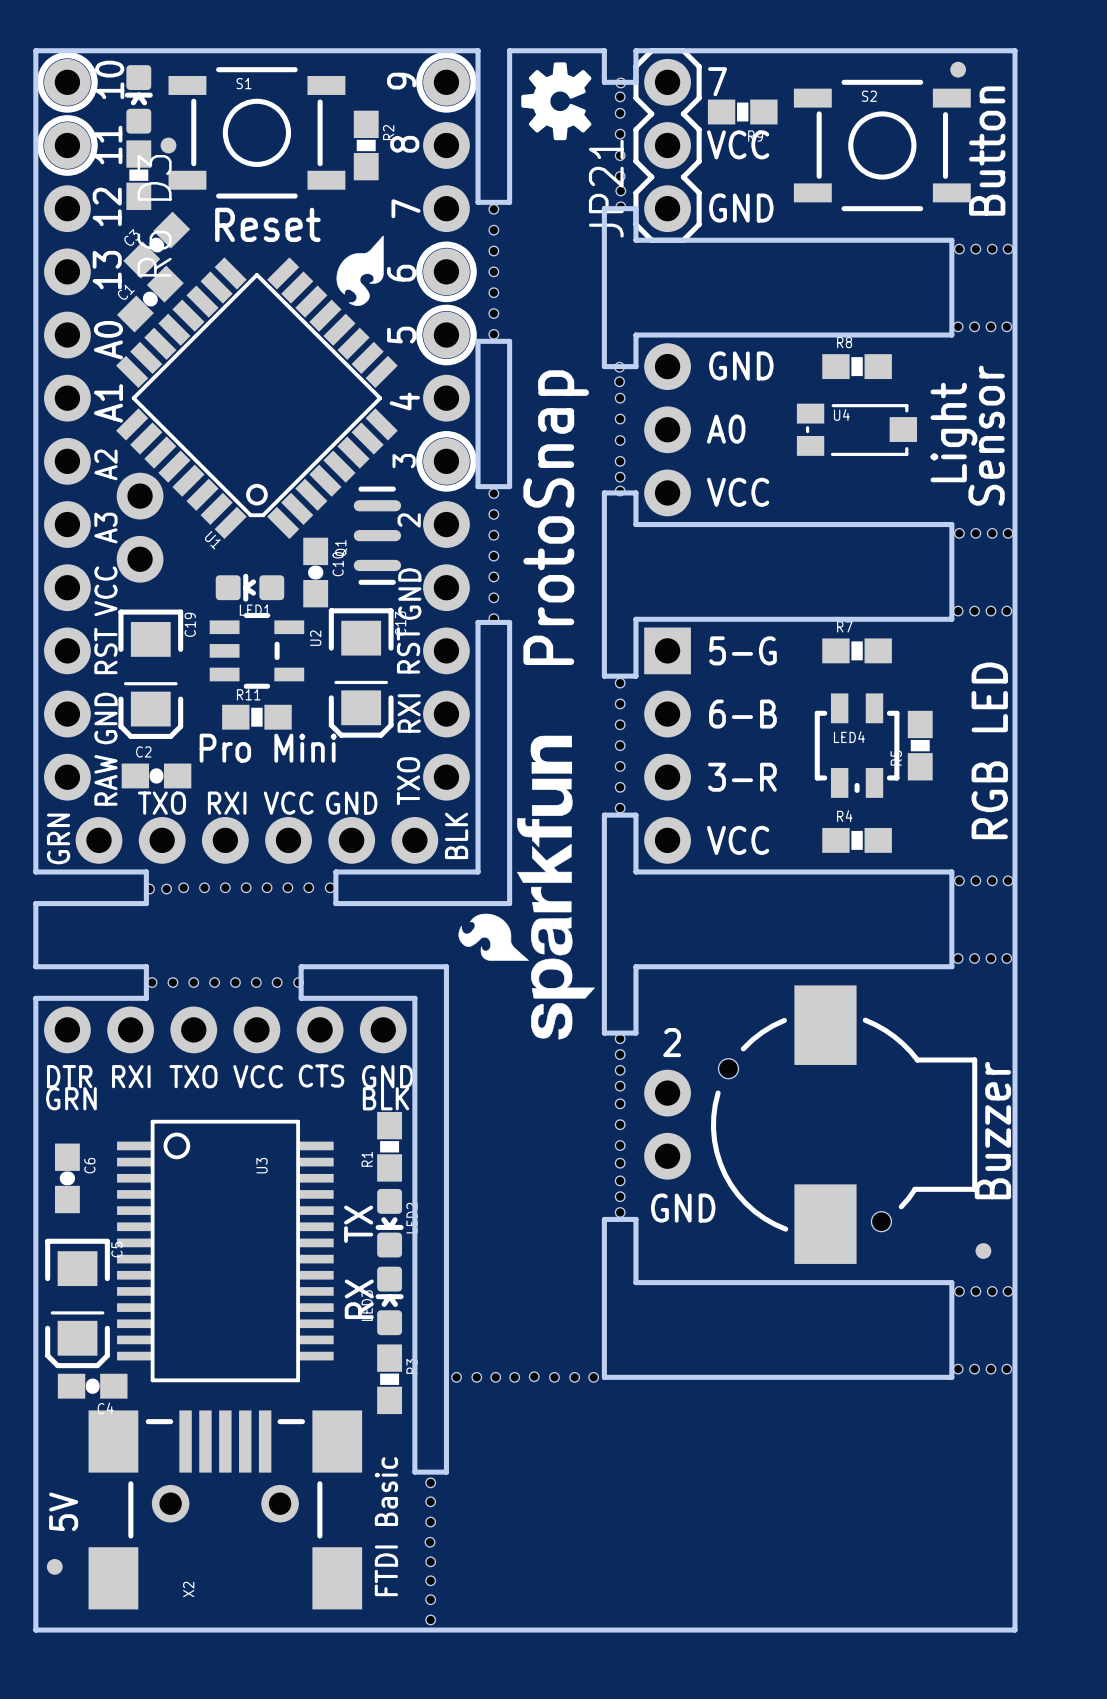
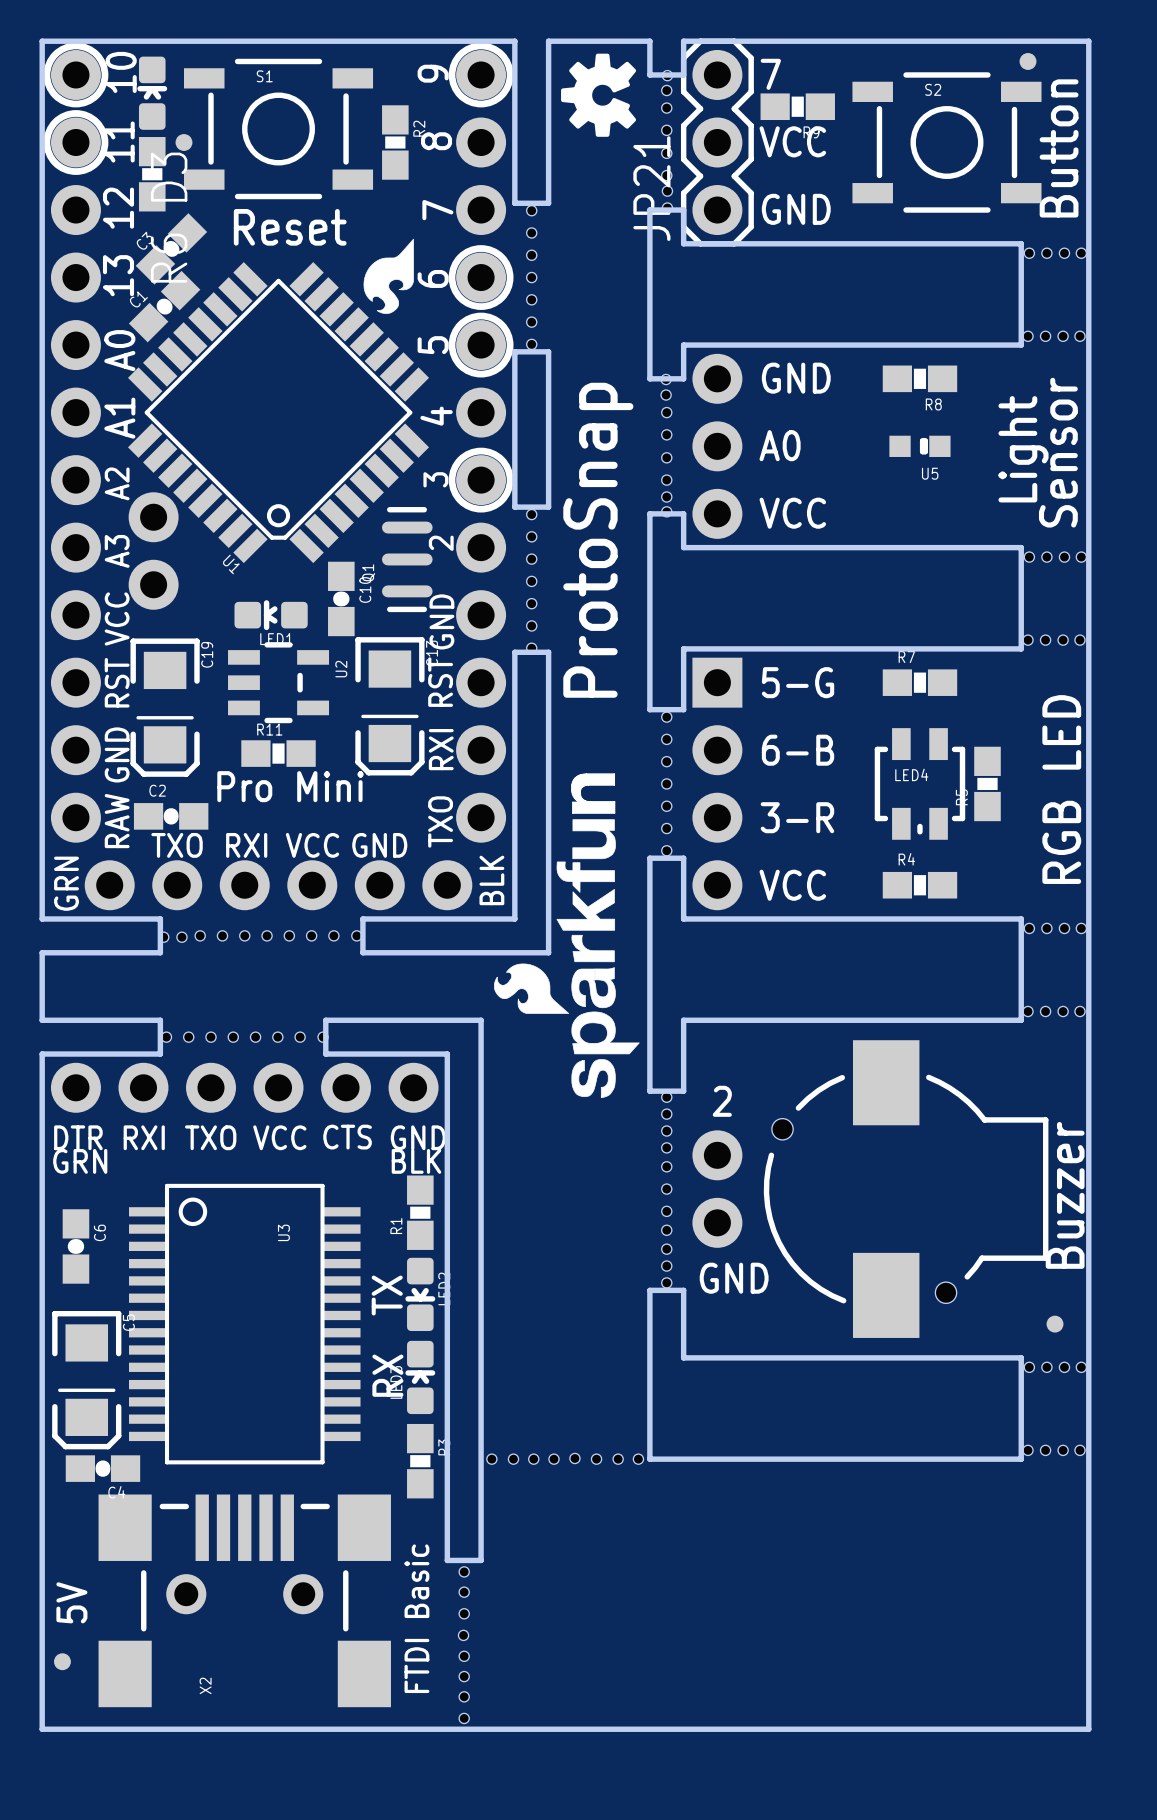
R8 name position: R8 (844, 342) -> R8 (933, 404)
U4: (856, 429) -> none
U5: none -> (919, 446)

